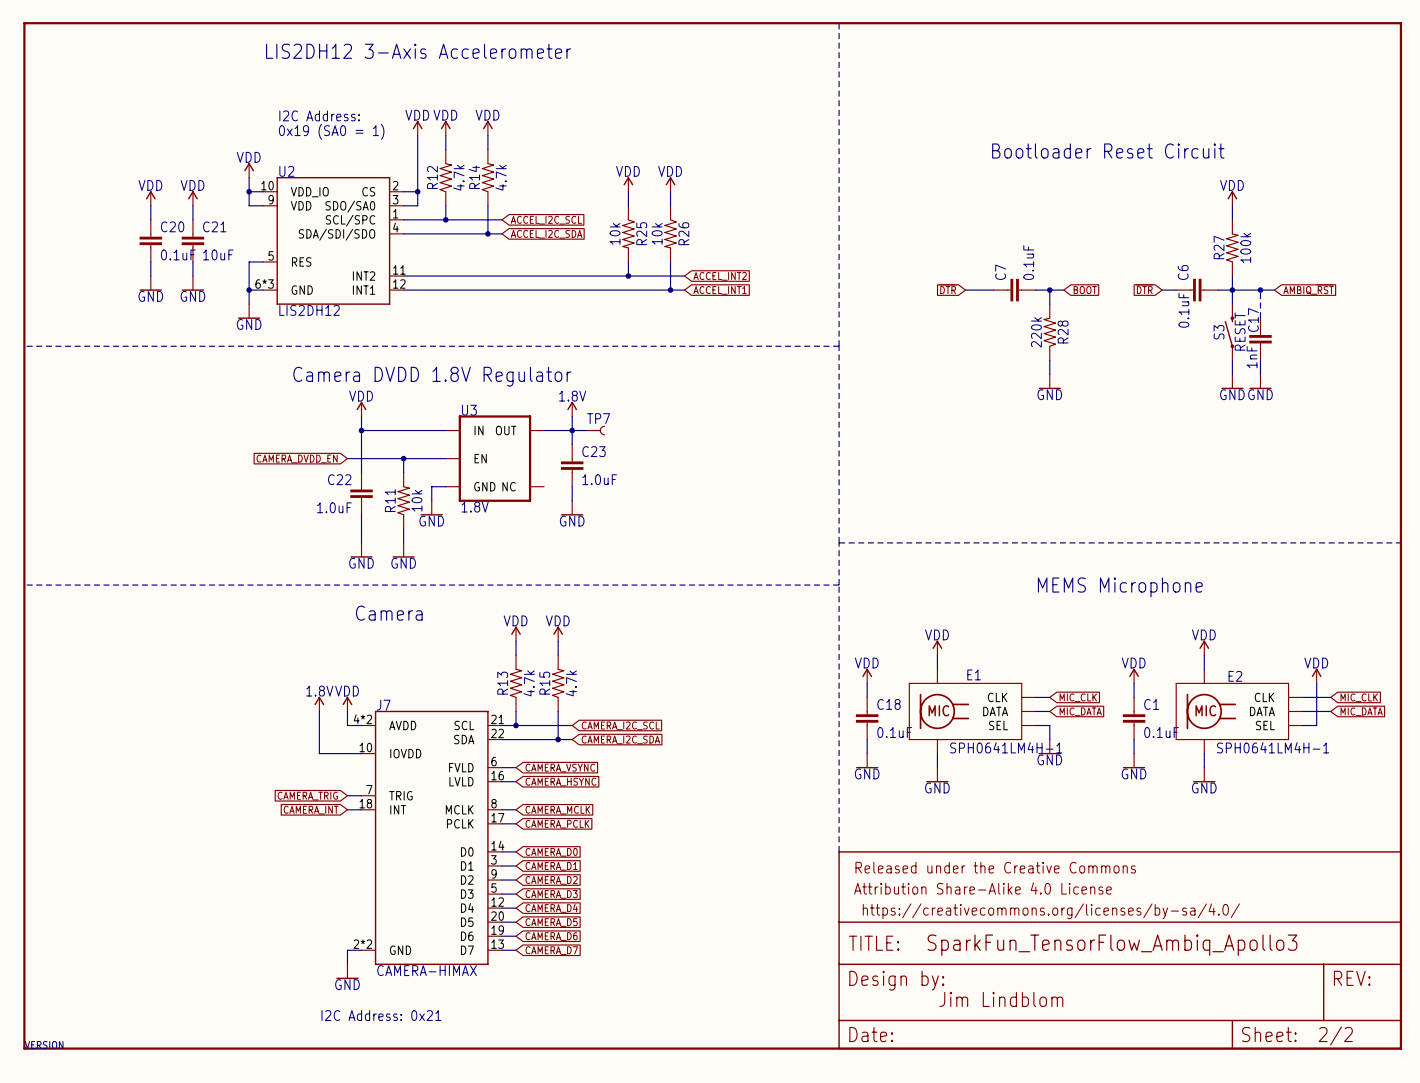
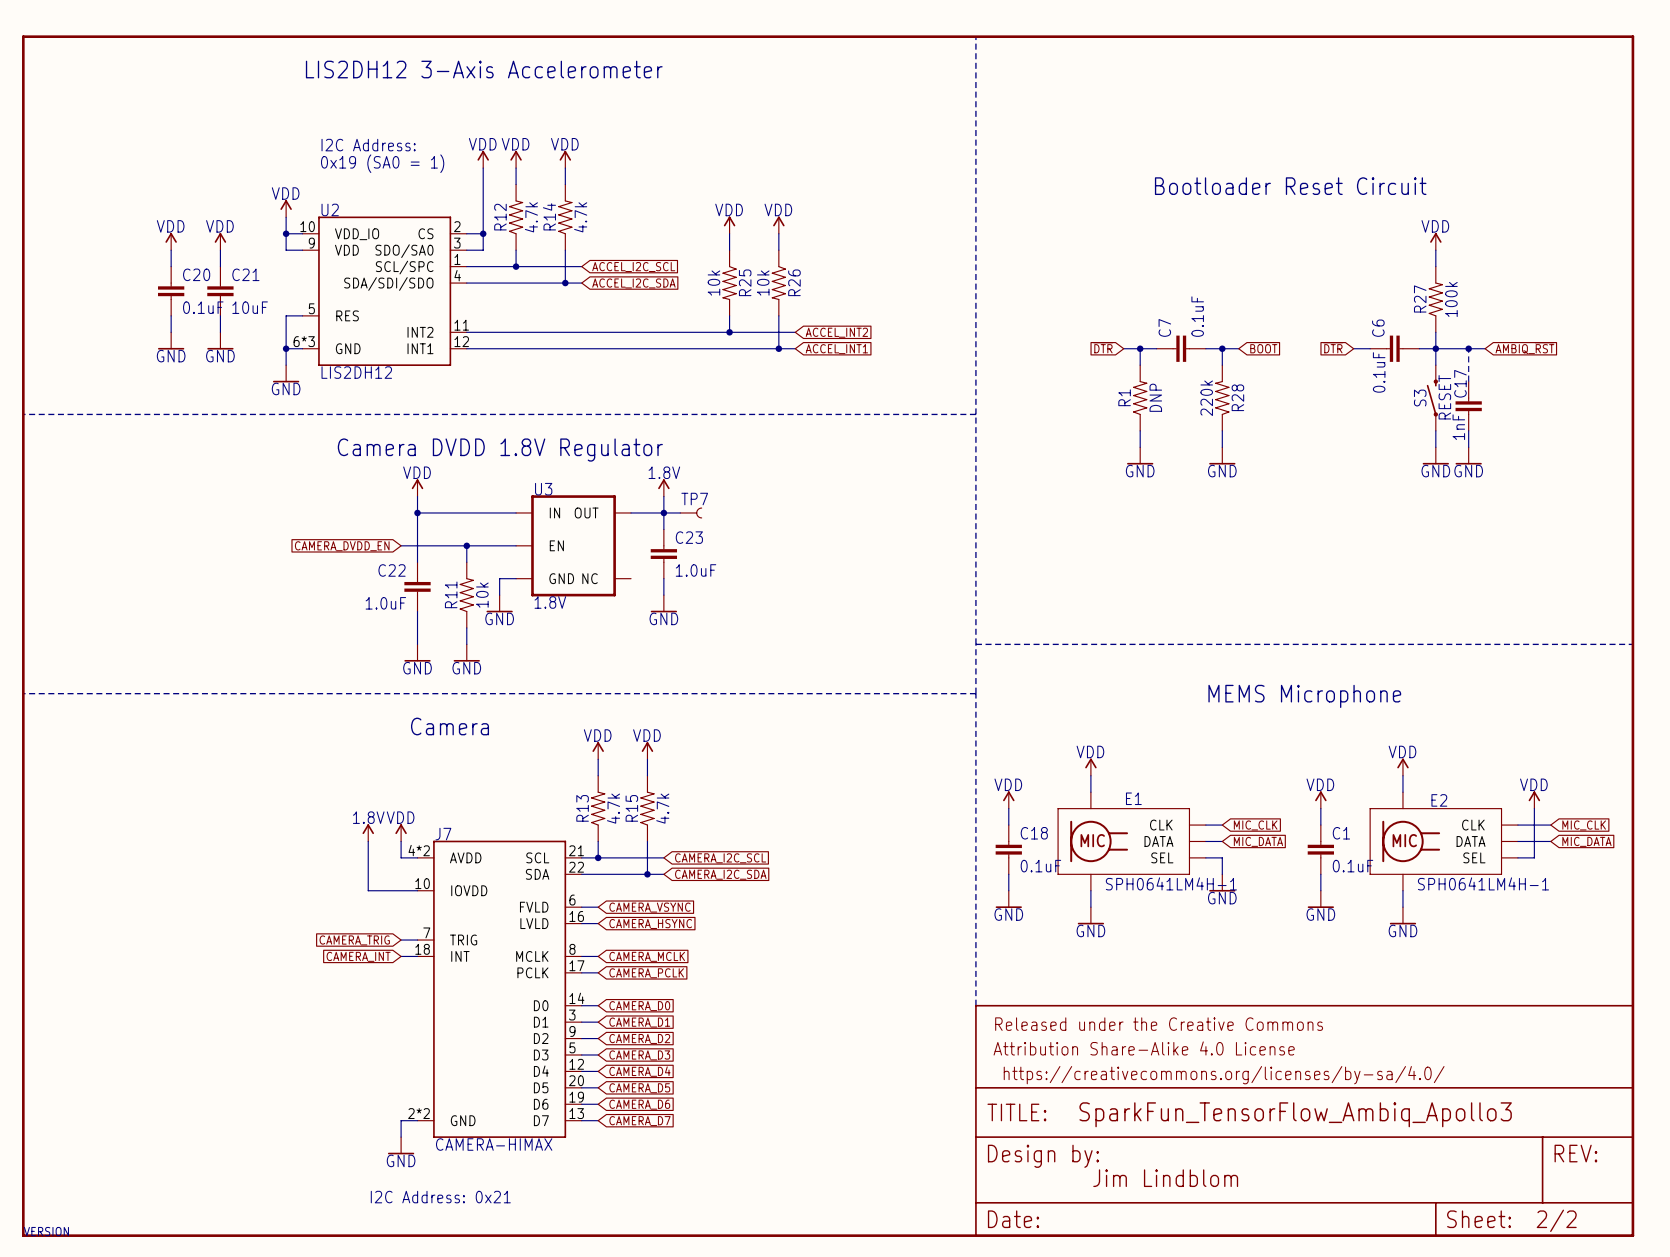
wire: none -> (1140, 348) (1140, 365)
junction: none -> (1140, 348)
R1: none -> DNP (1140, 398)
wire: none -> (1140, 430) (1140, 447)
power symbol: none -> GND (1140, 455)

